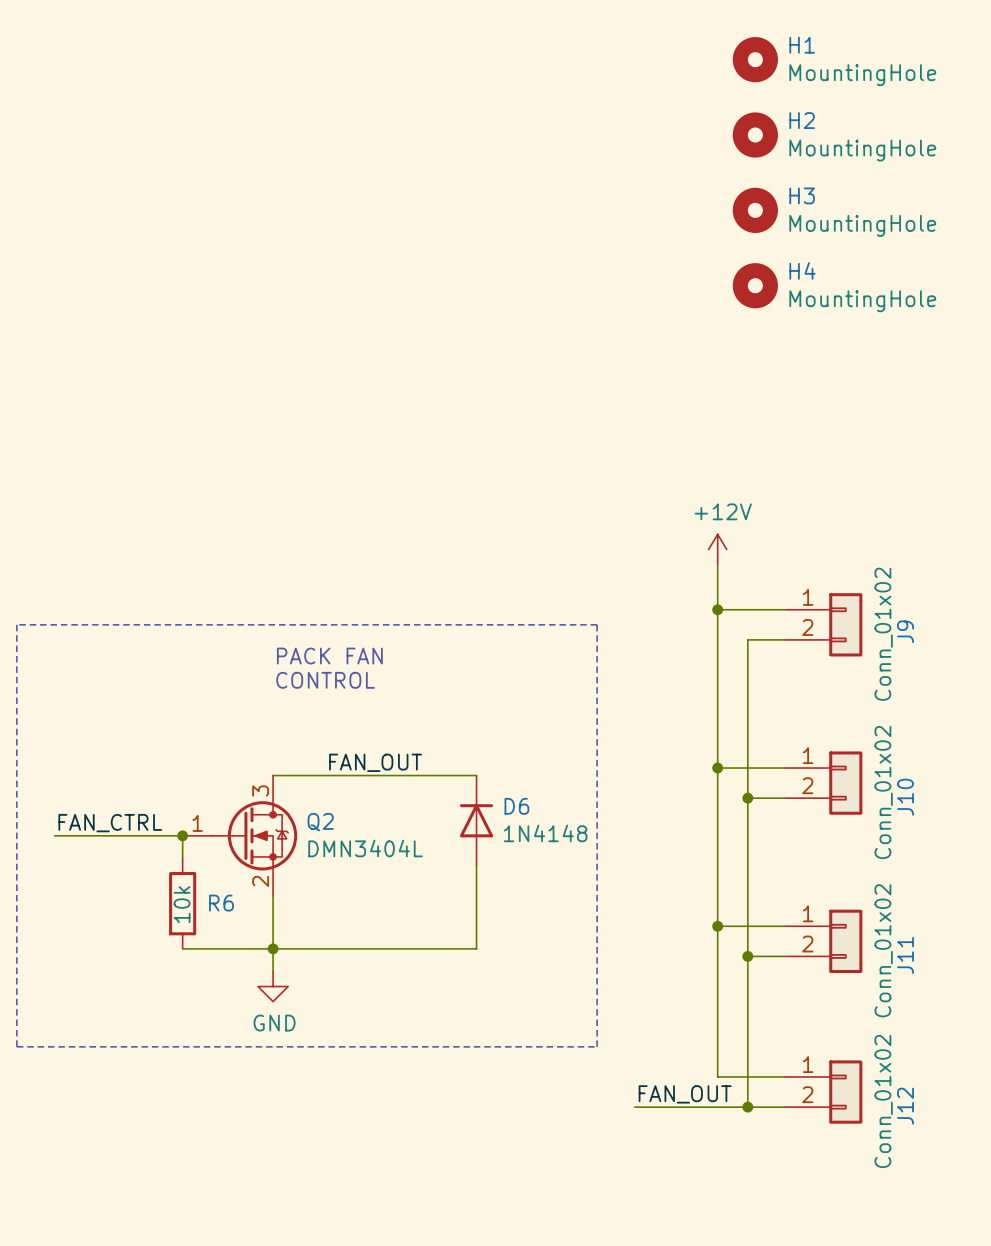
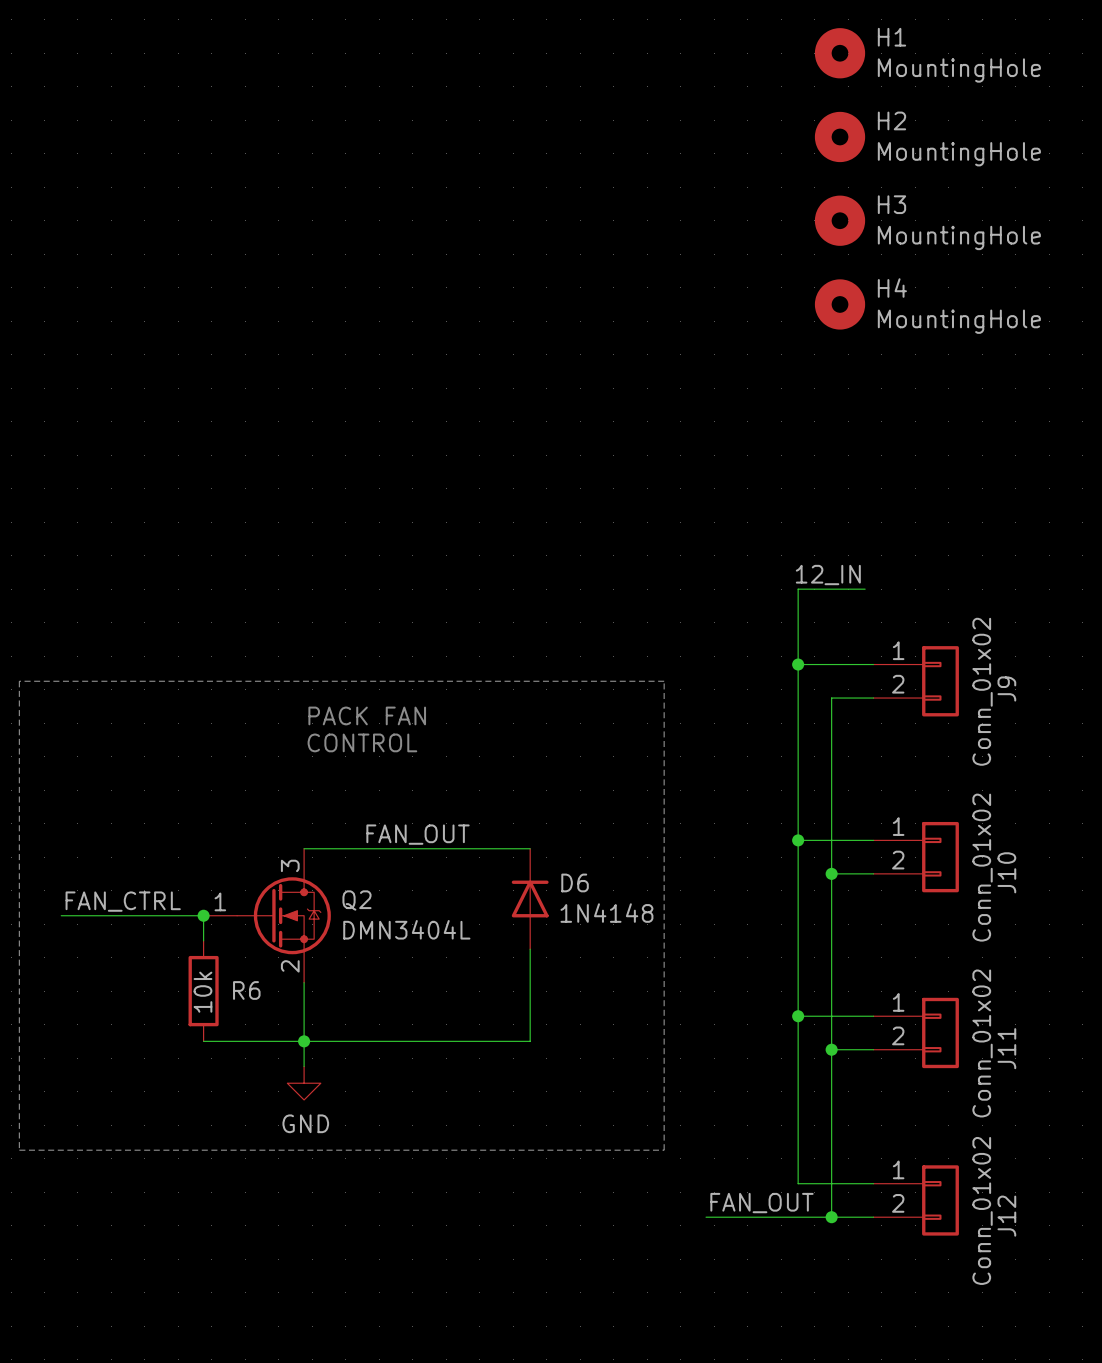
label: none -> 12_IN (828, 575)
wire: none -> (865, 589) (798, 589) (798, 614)
power symbol: +12V (717, 549) -> none

